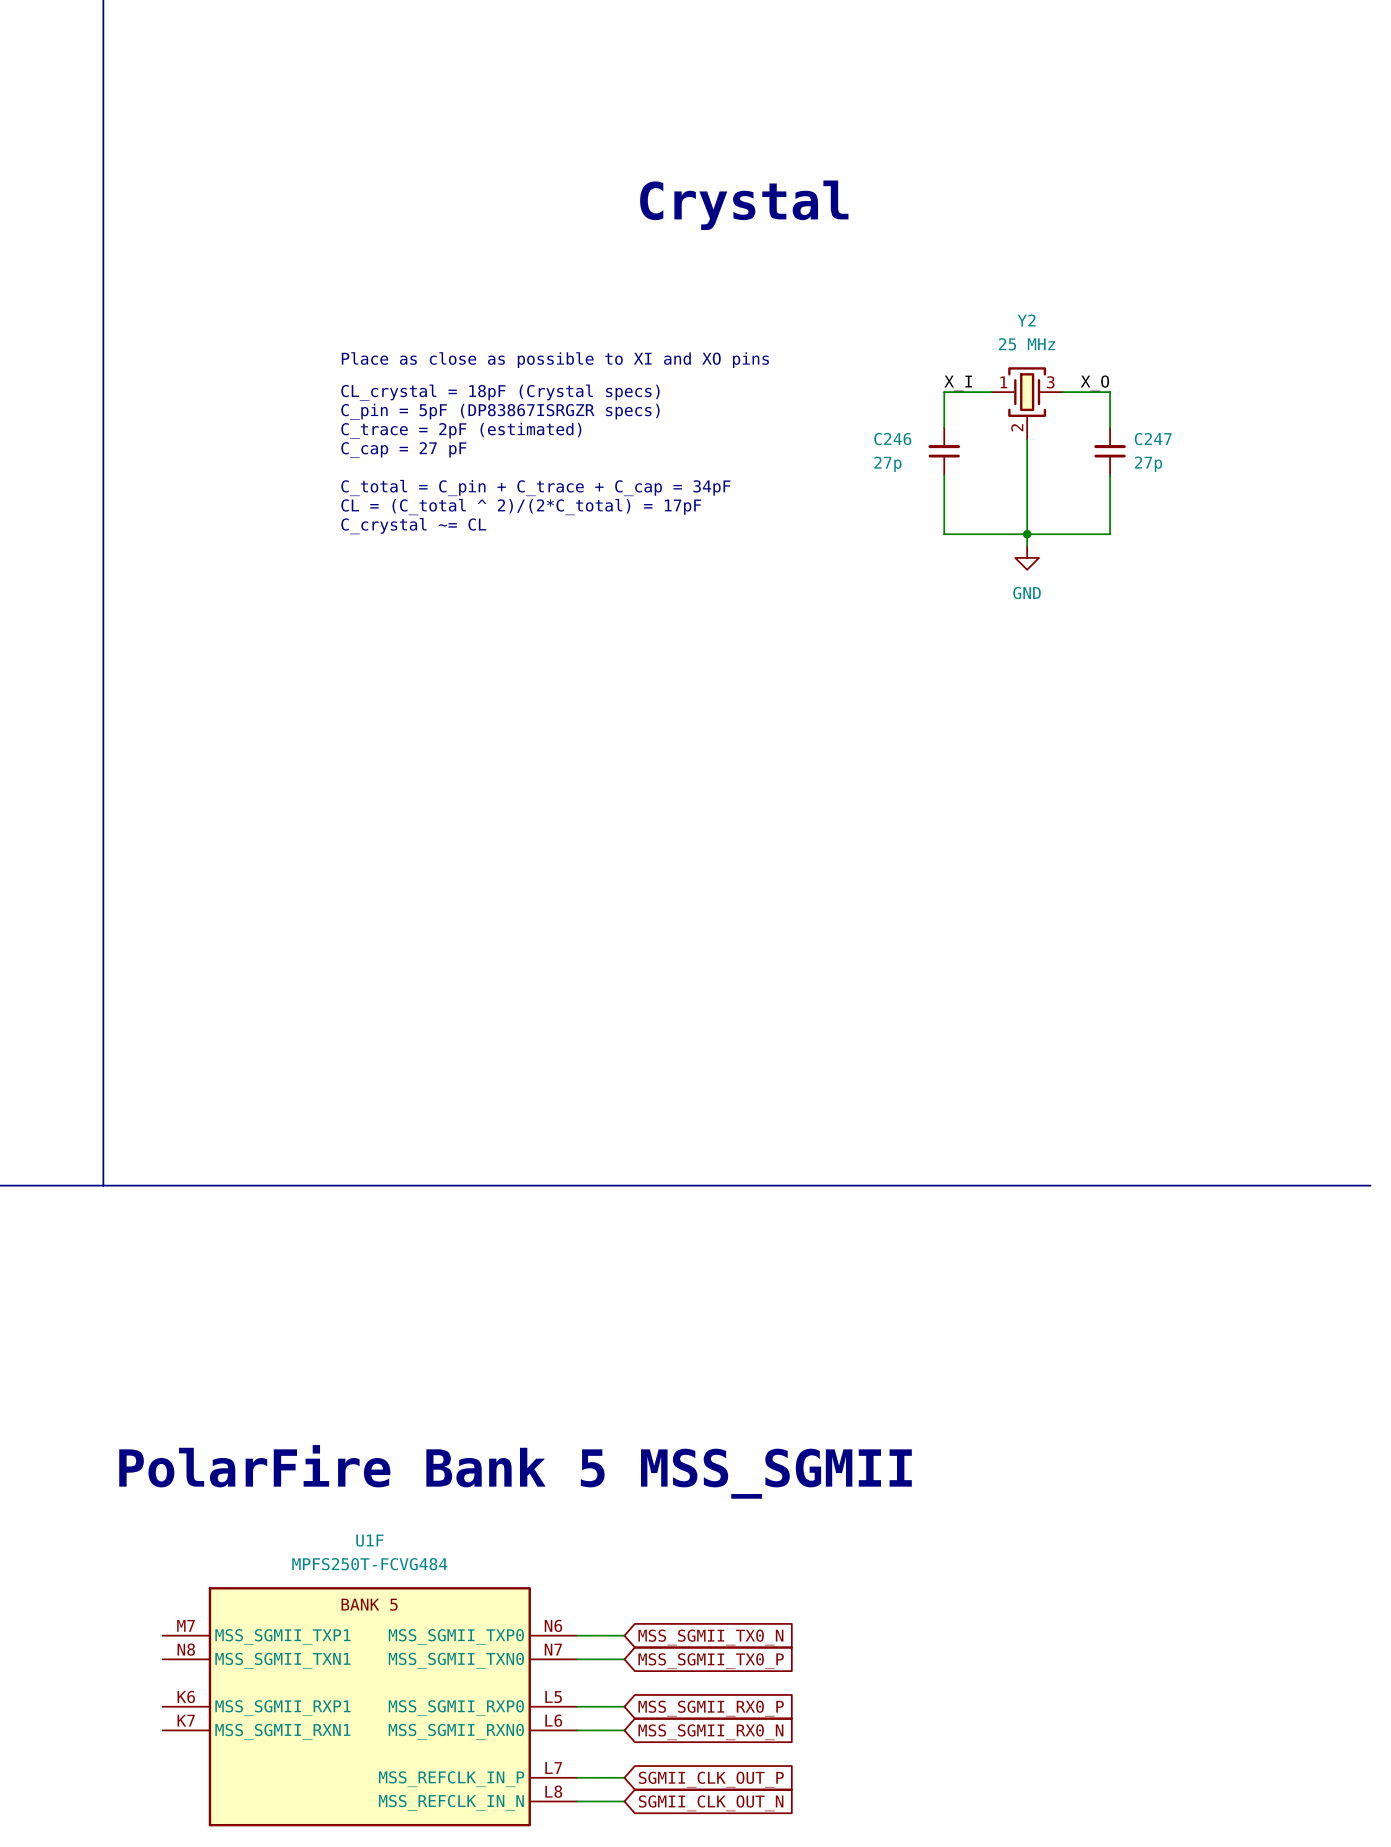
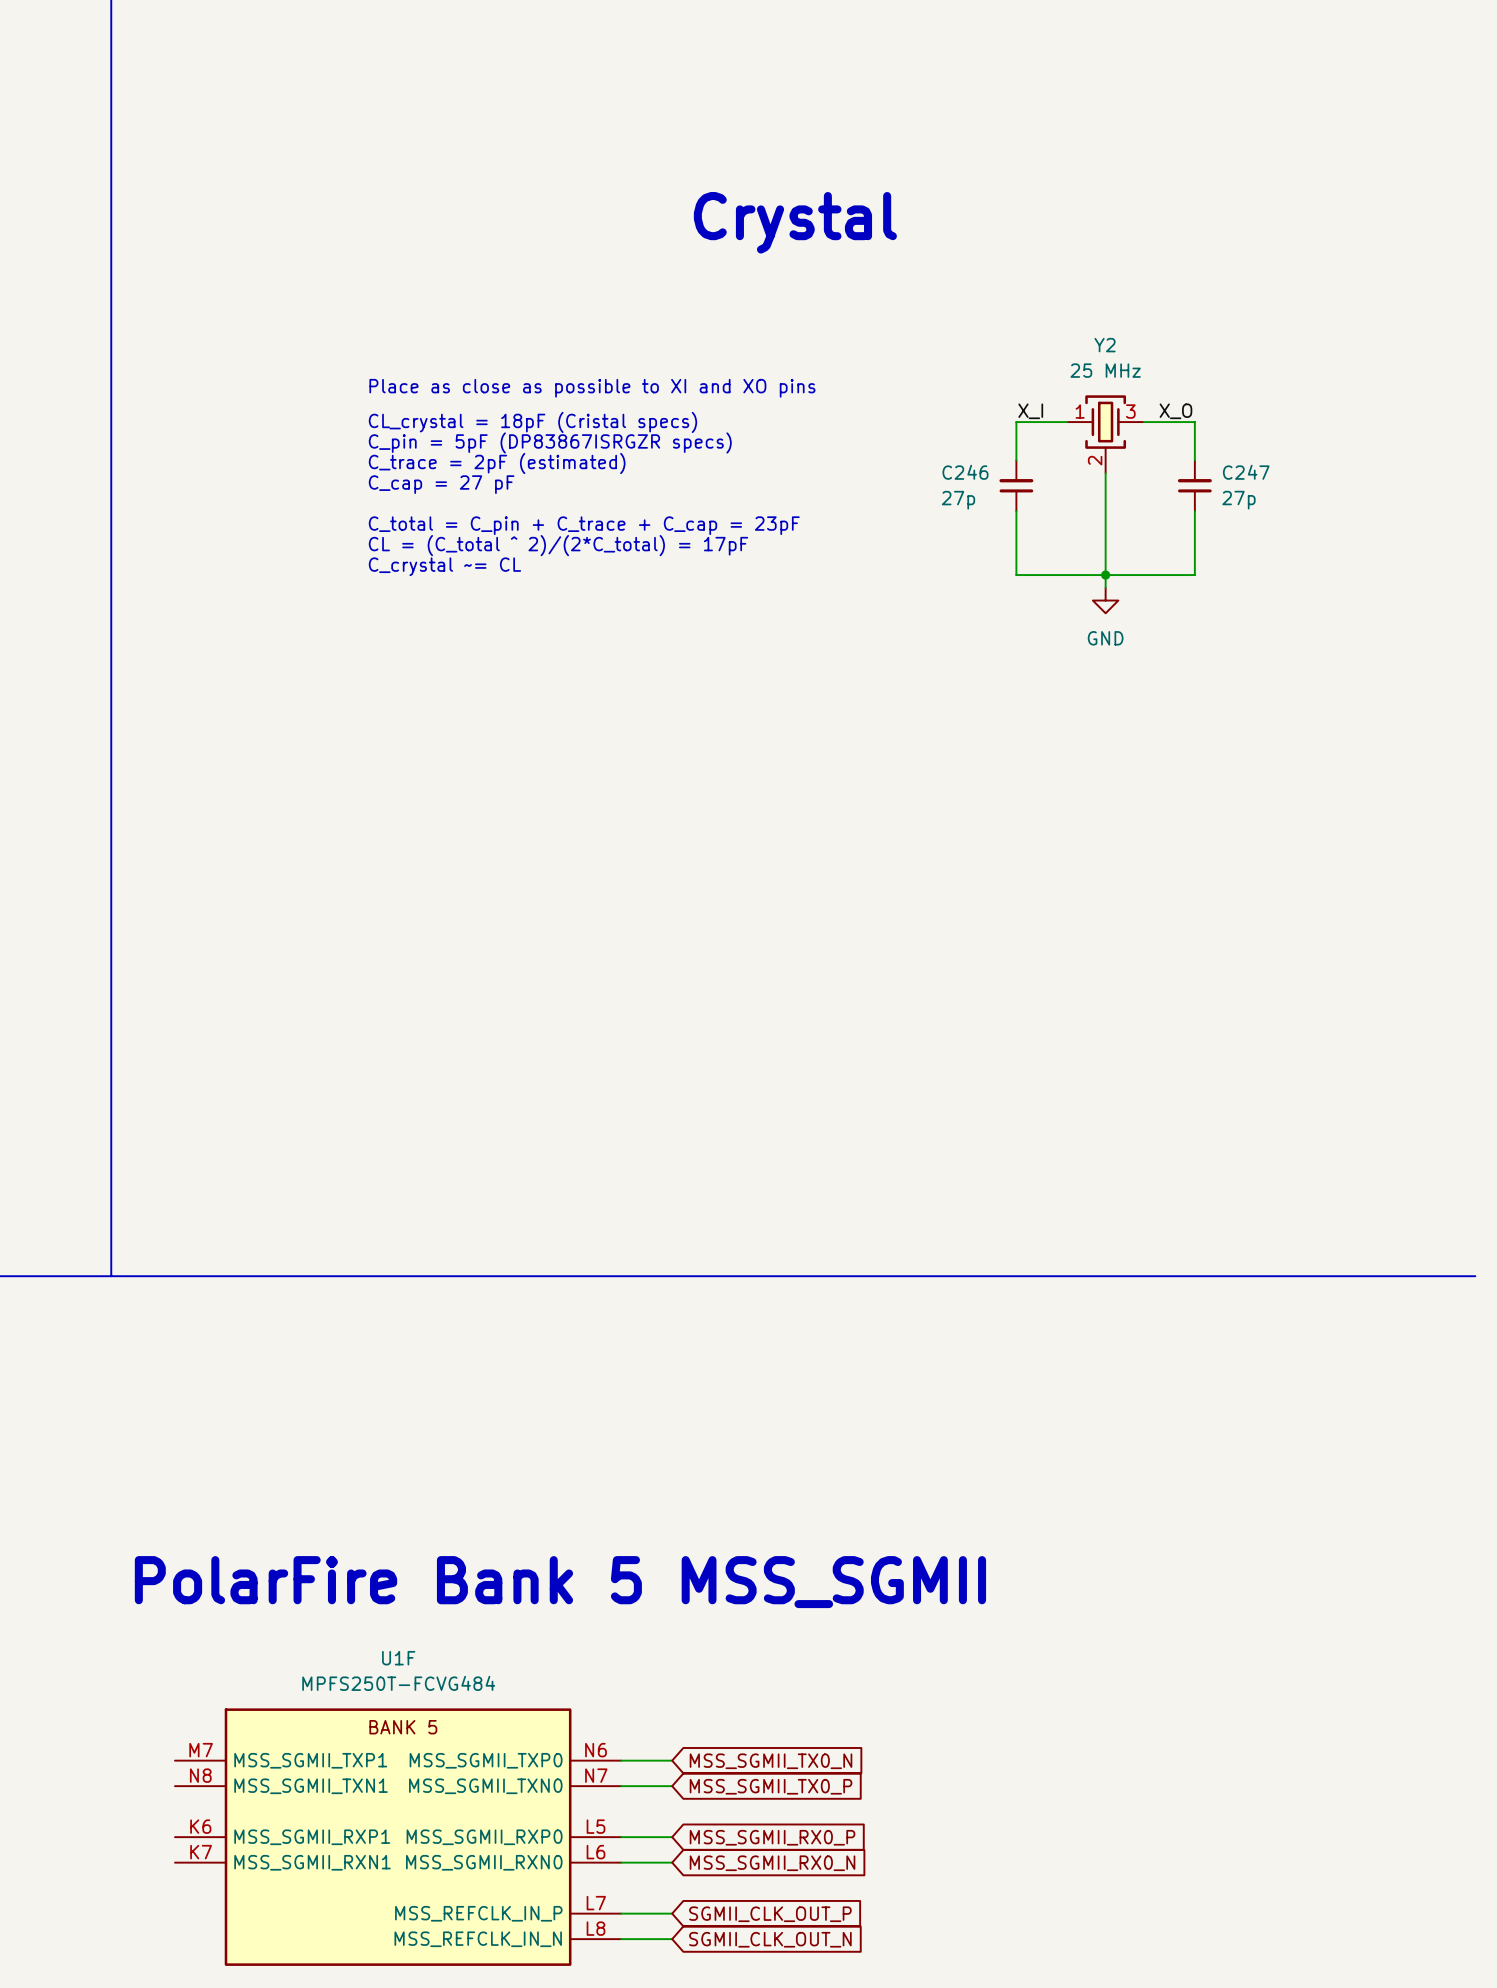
text: CL_crystal = 18pF (Crystal specs) (500, 392) -> CL_crystal = 18pF (Cristal specs) (532, 422)
text: C_total = C_pin + C_trace + C_cap = 34pF (535, 488) -> C_total = C_pin + C_trace + C_cap = 23pF (584, 525)

